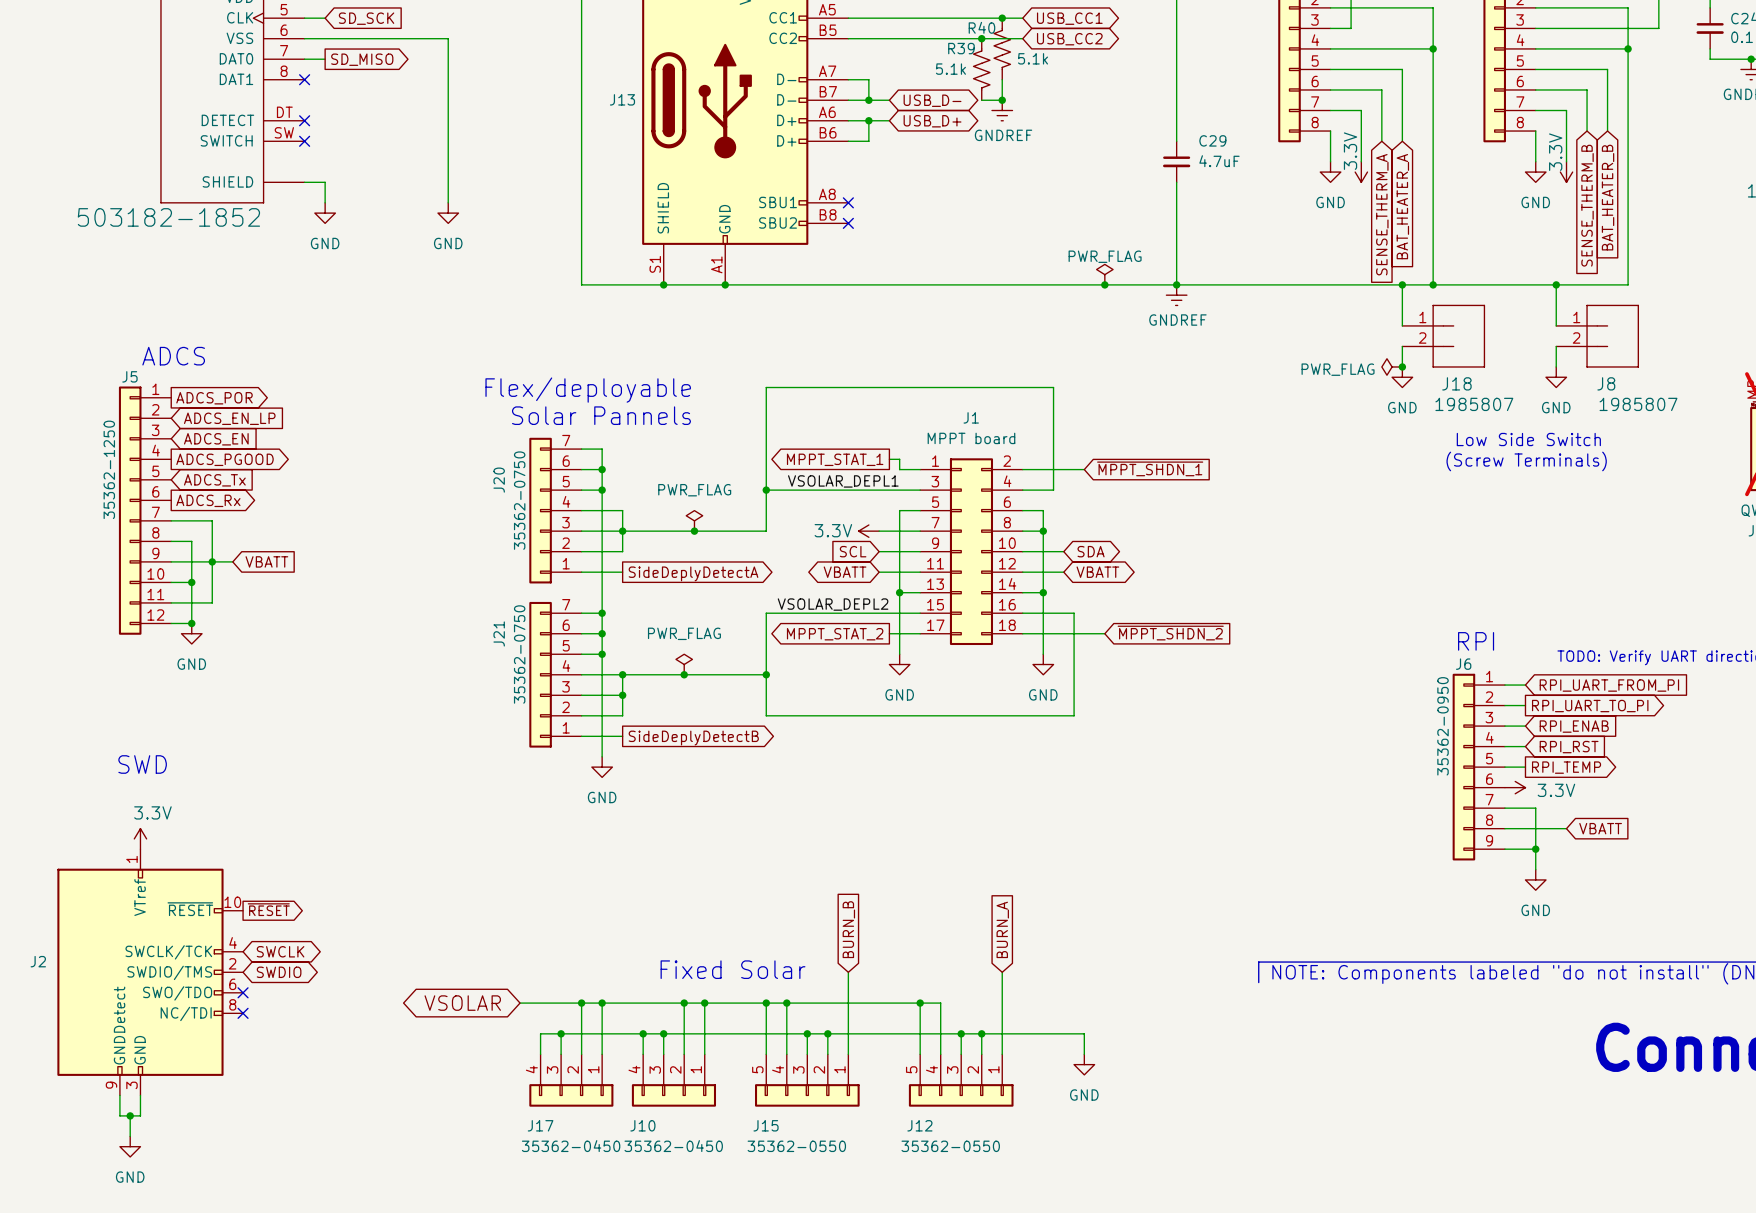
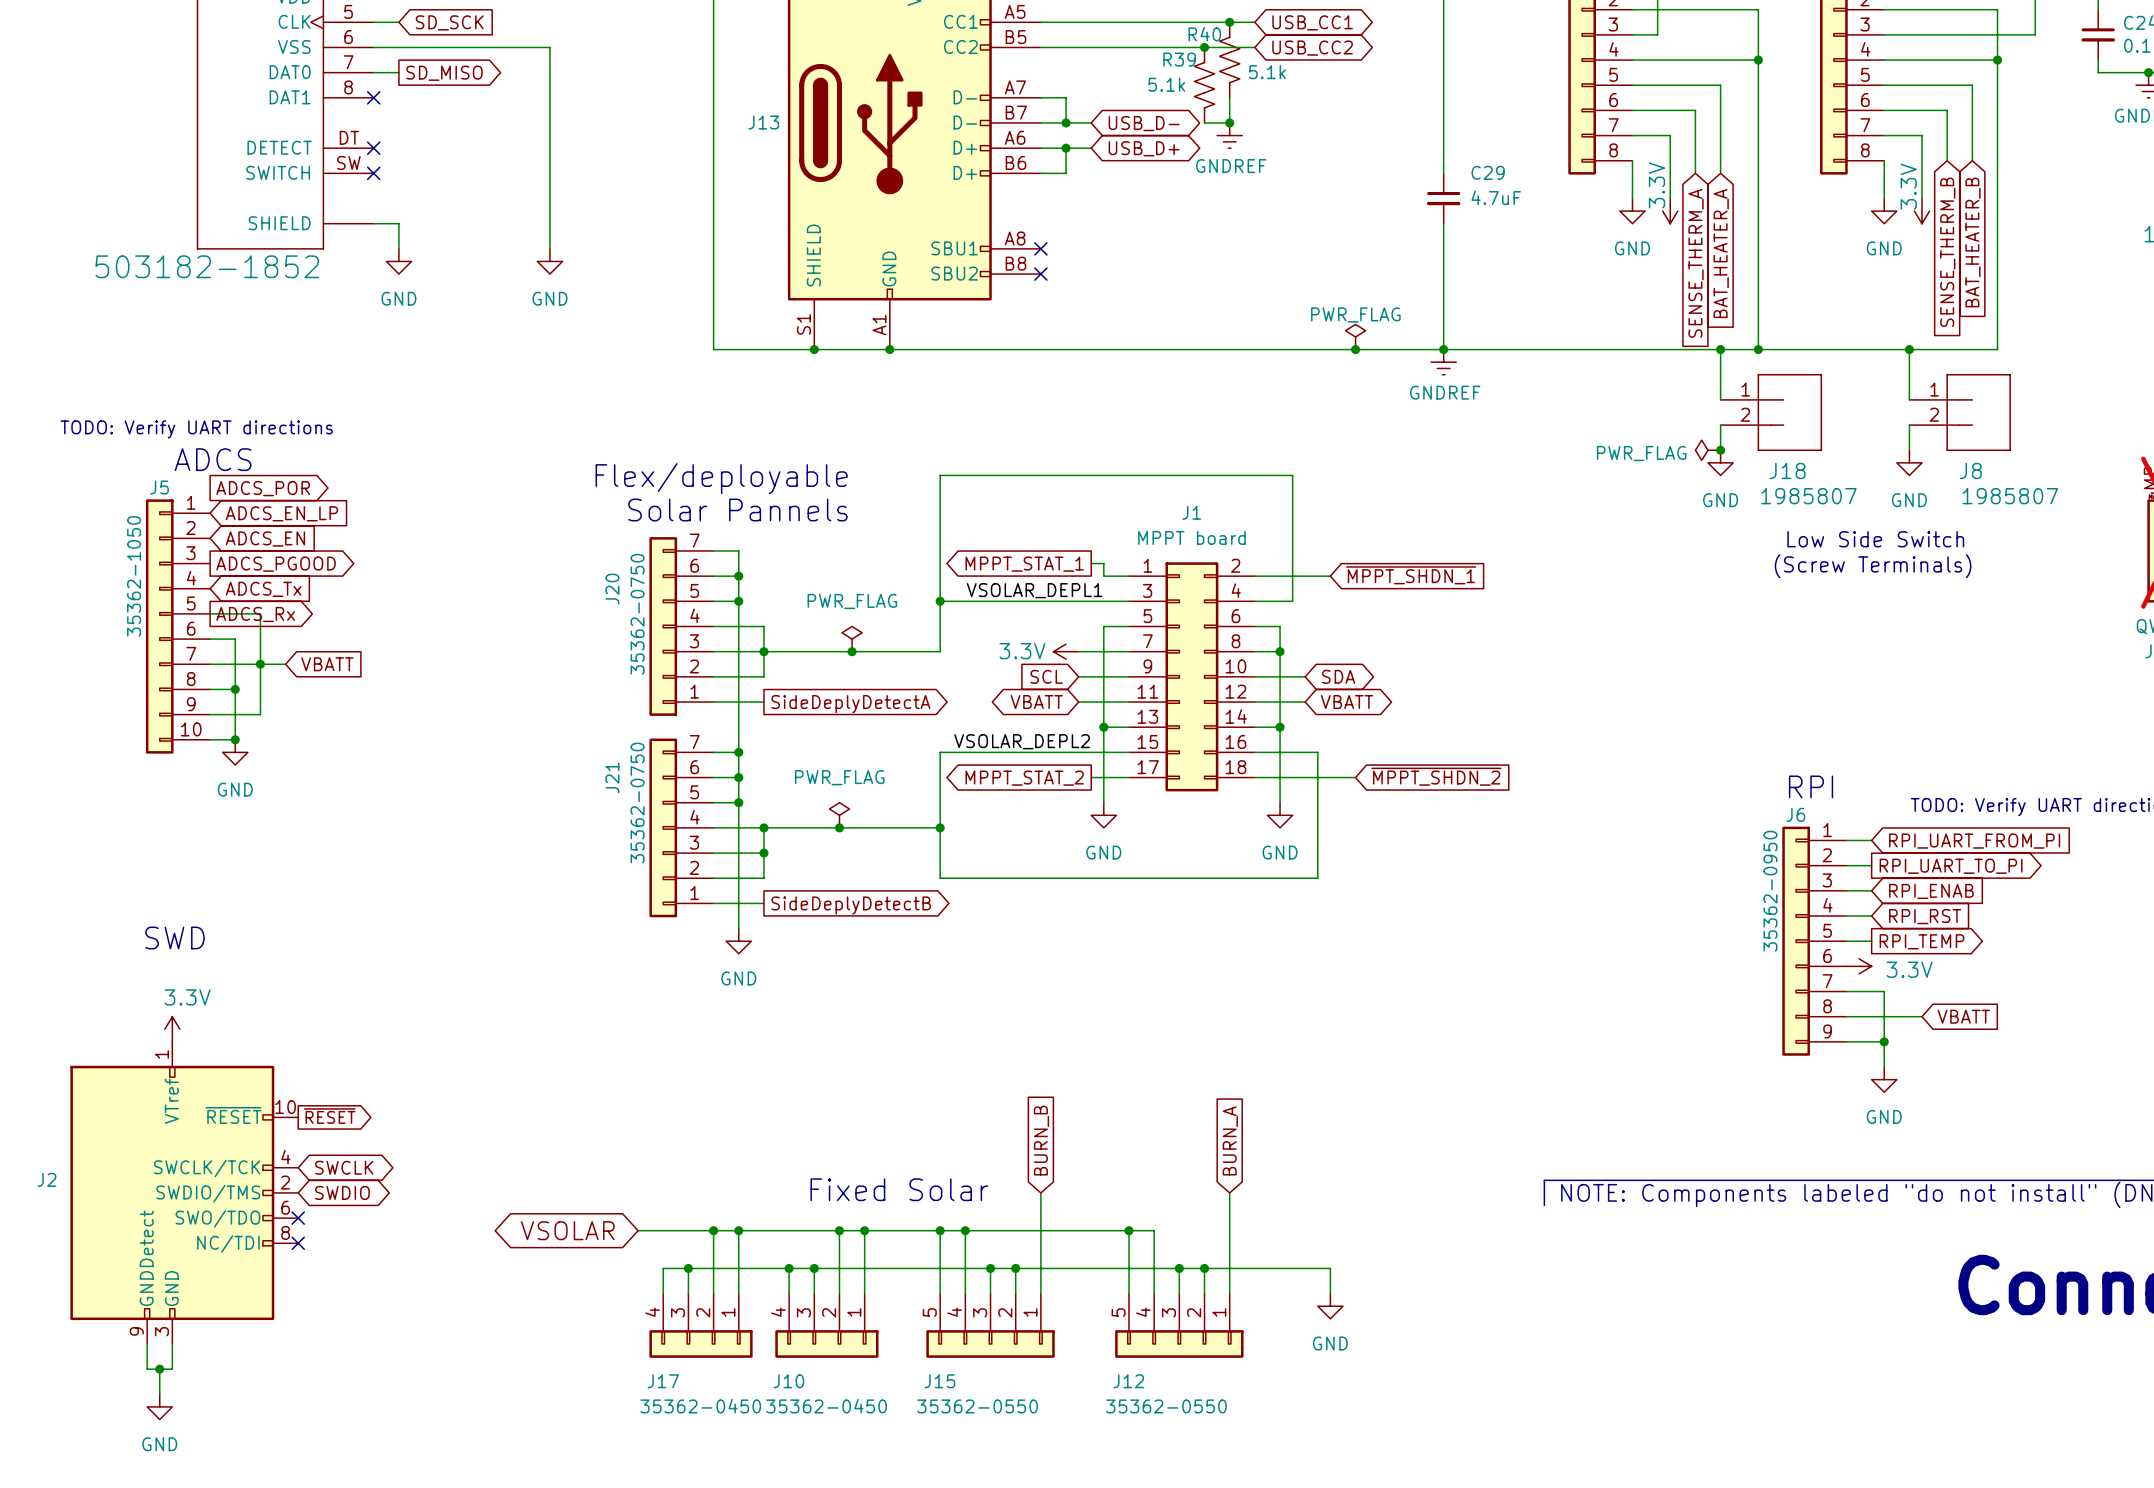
text: none -> TODO: Verify UART directions (196, 429)
text position: ADCS (173, 356) -> ADCS (213, 459)
J5 name position: J5 (129, 376) -> J5 (159, 487)
J5 symbol: [118, 386, 172, 635] -> [145, 499, 211, 754]
J5 value: 35362-1250 (109, 469) -> 35362-1050 (134, 576)
wire: none -> (210, 613) (260, 613) (260, 639)
wire: (191, 520) (212, 520) -> (235, 639) (235, 664) (285, 664)
junction: none -> (260, 664)
wire: (191, 561) (232, 561) -> none
junction: none -> (235, 689)
junction: (212, 561) -> none
global label position: VBATT (266, 561) -> VBATT (327, 664)
junction: (191, 582) -> none
wire: (212, 582) (212, 602) (191, 602) (191, 623) (171, 623) -> (260, 714) (235, 714)
junction: none -> (235, 739)
junction: (191, 623) -> none
power symbol position: GND (191, 633) -> GND (235, 752)

